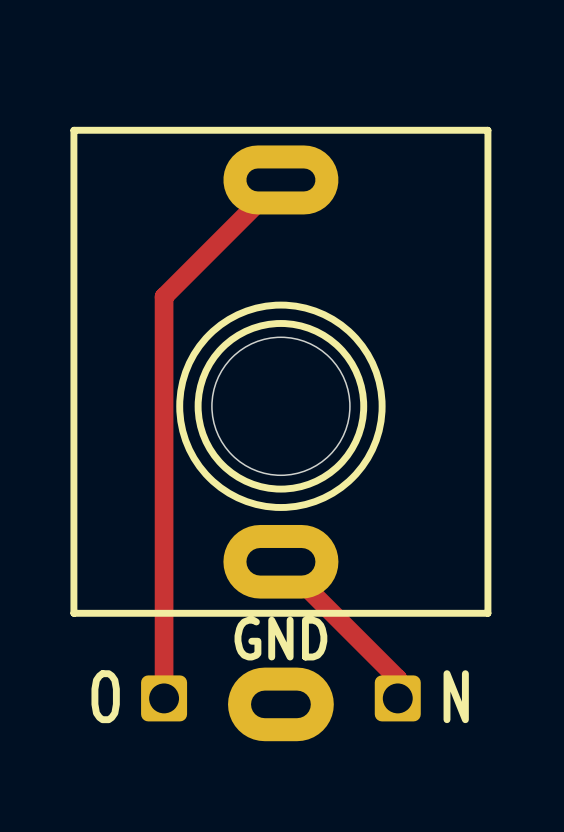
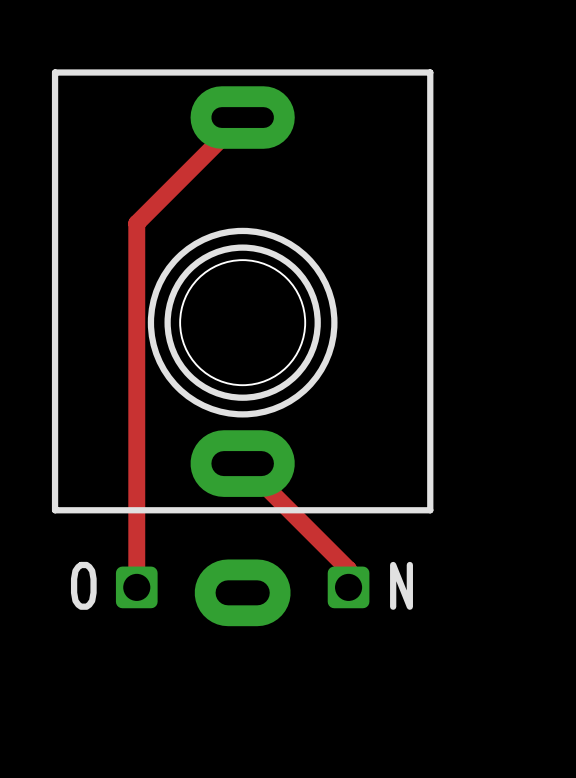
text: GND (280, 638) -> none

